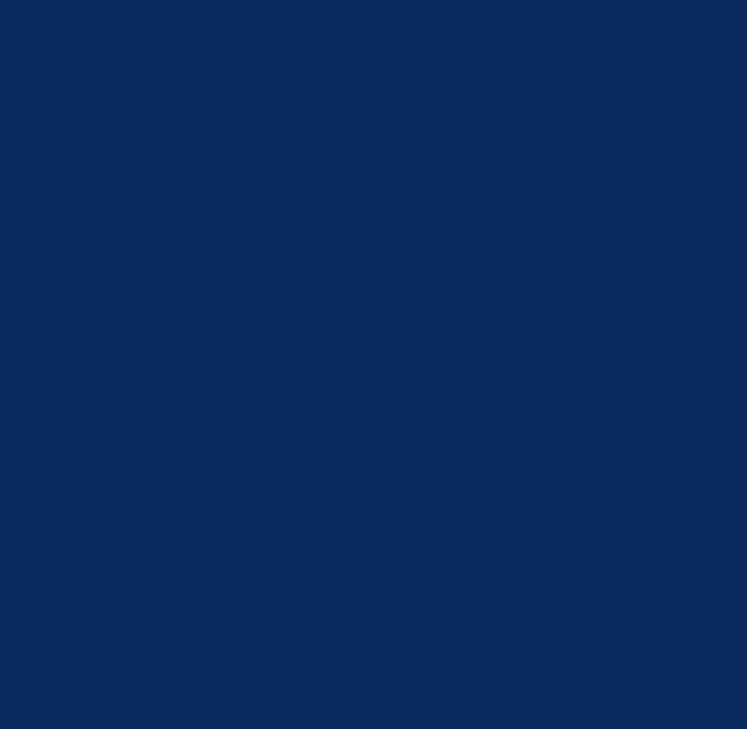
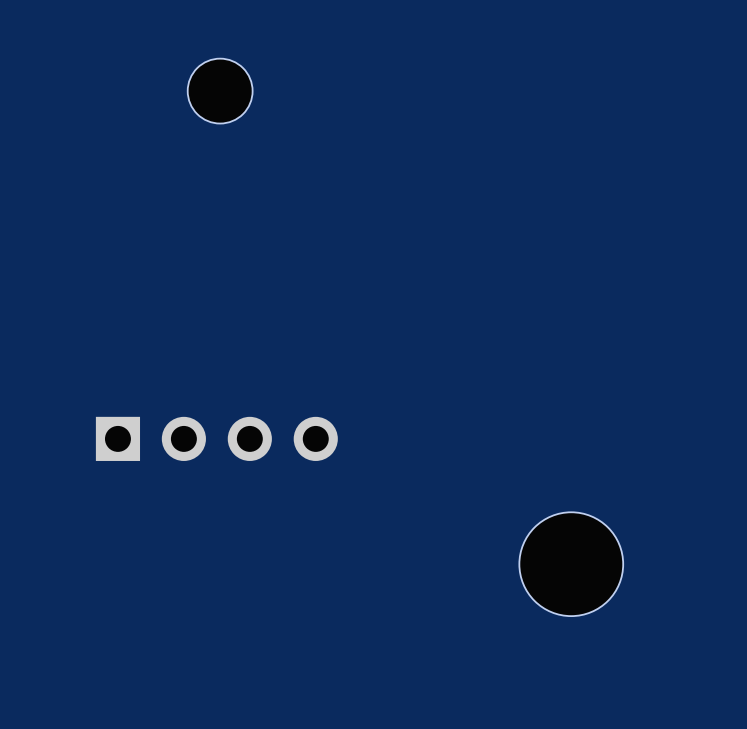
part: none -> (220, 91)
part: none -> (216, 438)
part: none -> (571, 564)

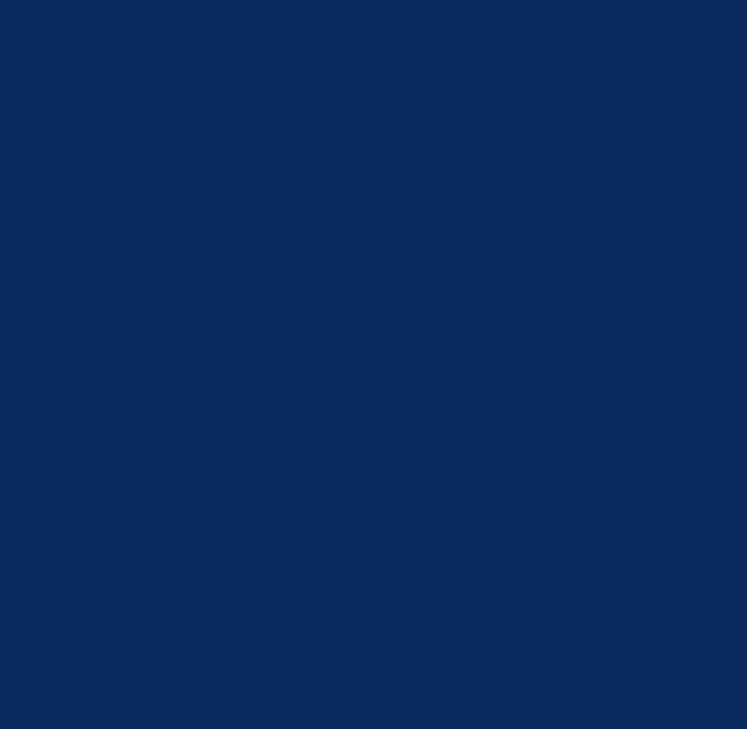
part: (220, 91) -> none
part: (216, 438) -> none
part: (571, 564) -> none

